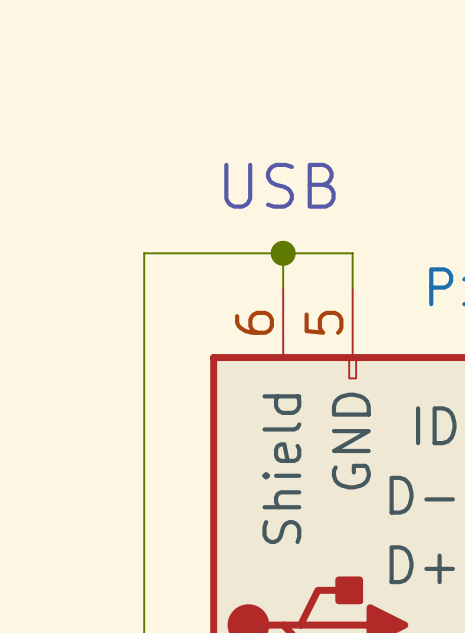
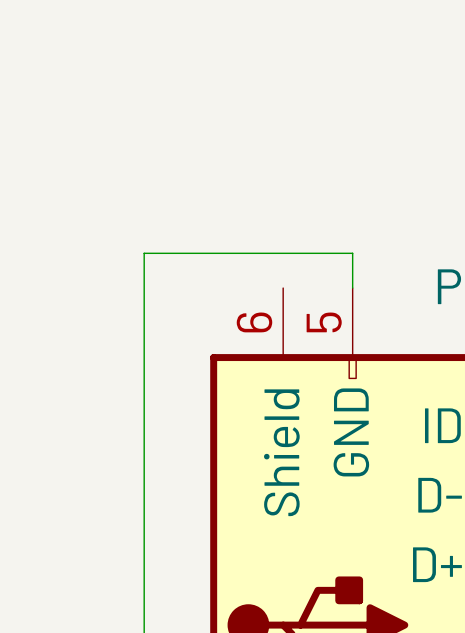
text: USB (279, 185) -> none
wire: (283, 253) (283, 288) -> none
junction: (283, 253) -> none

